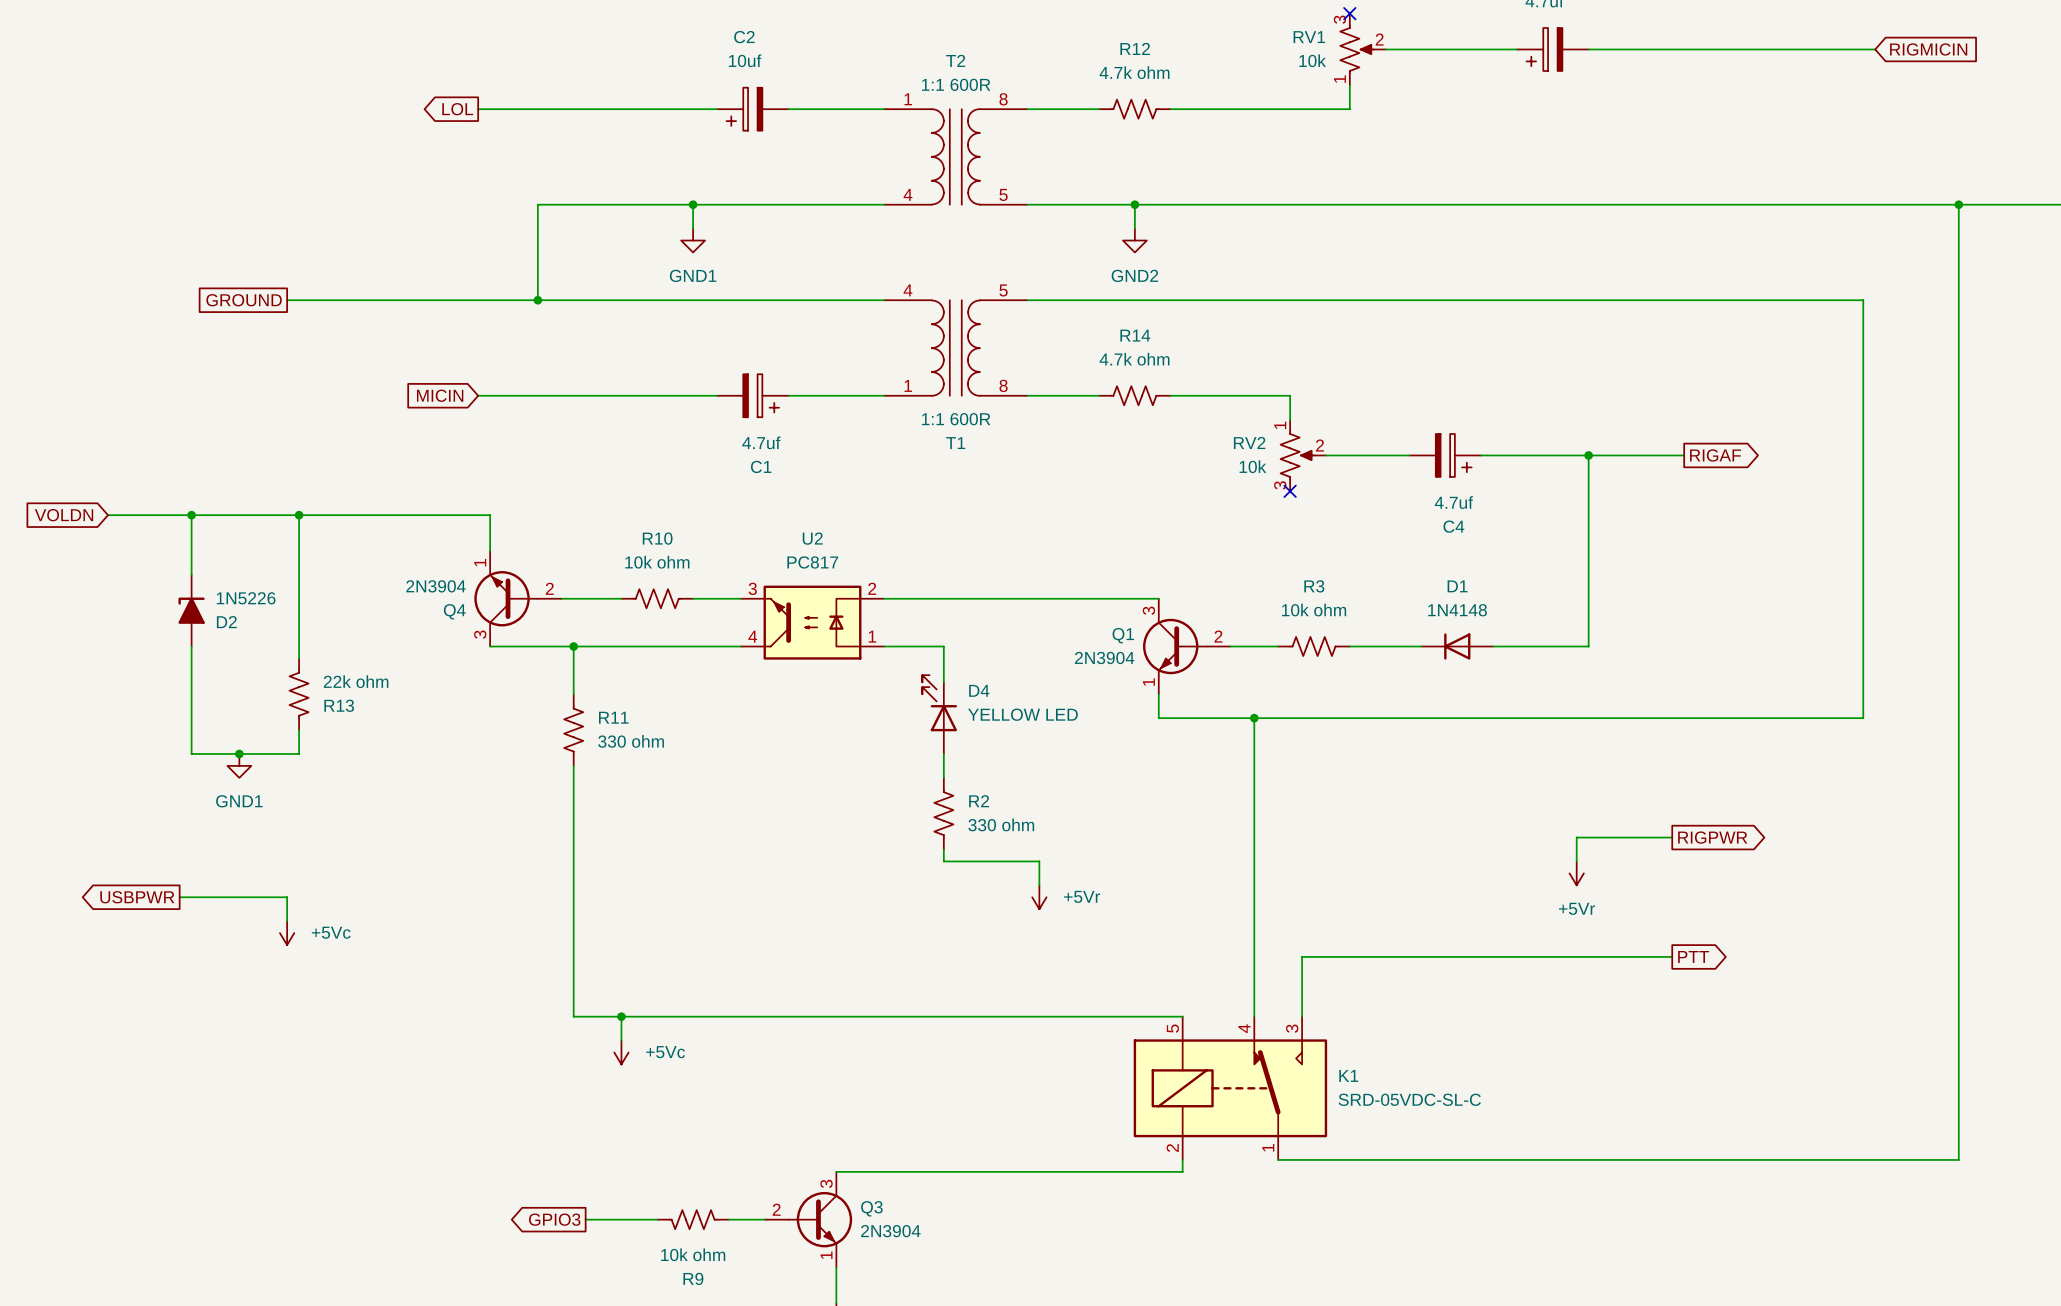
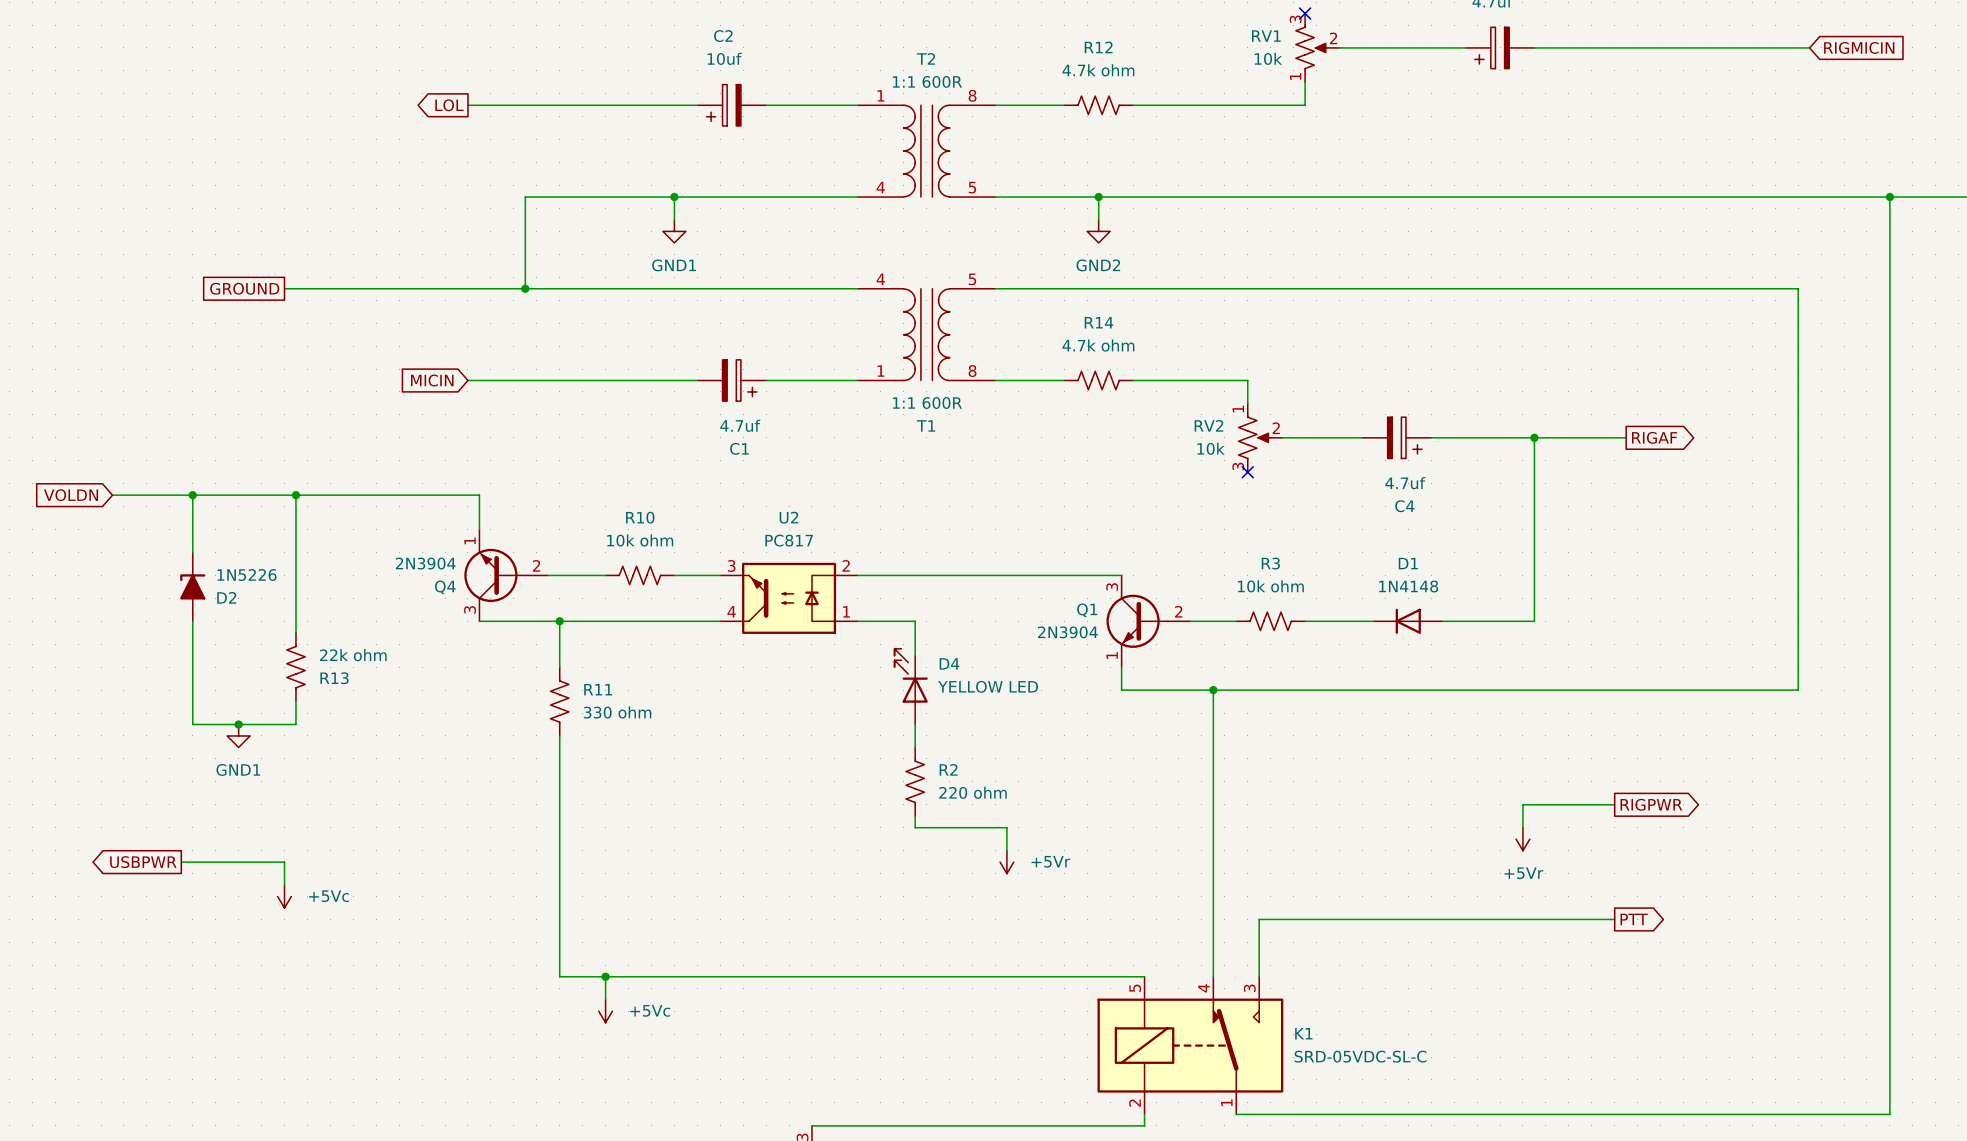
R2 value: 330 ohm (1001, 824) -> 220 ohm (973, 792)

